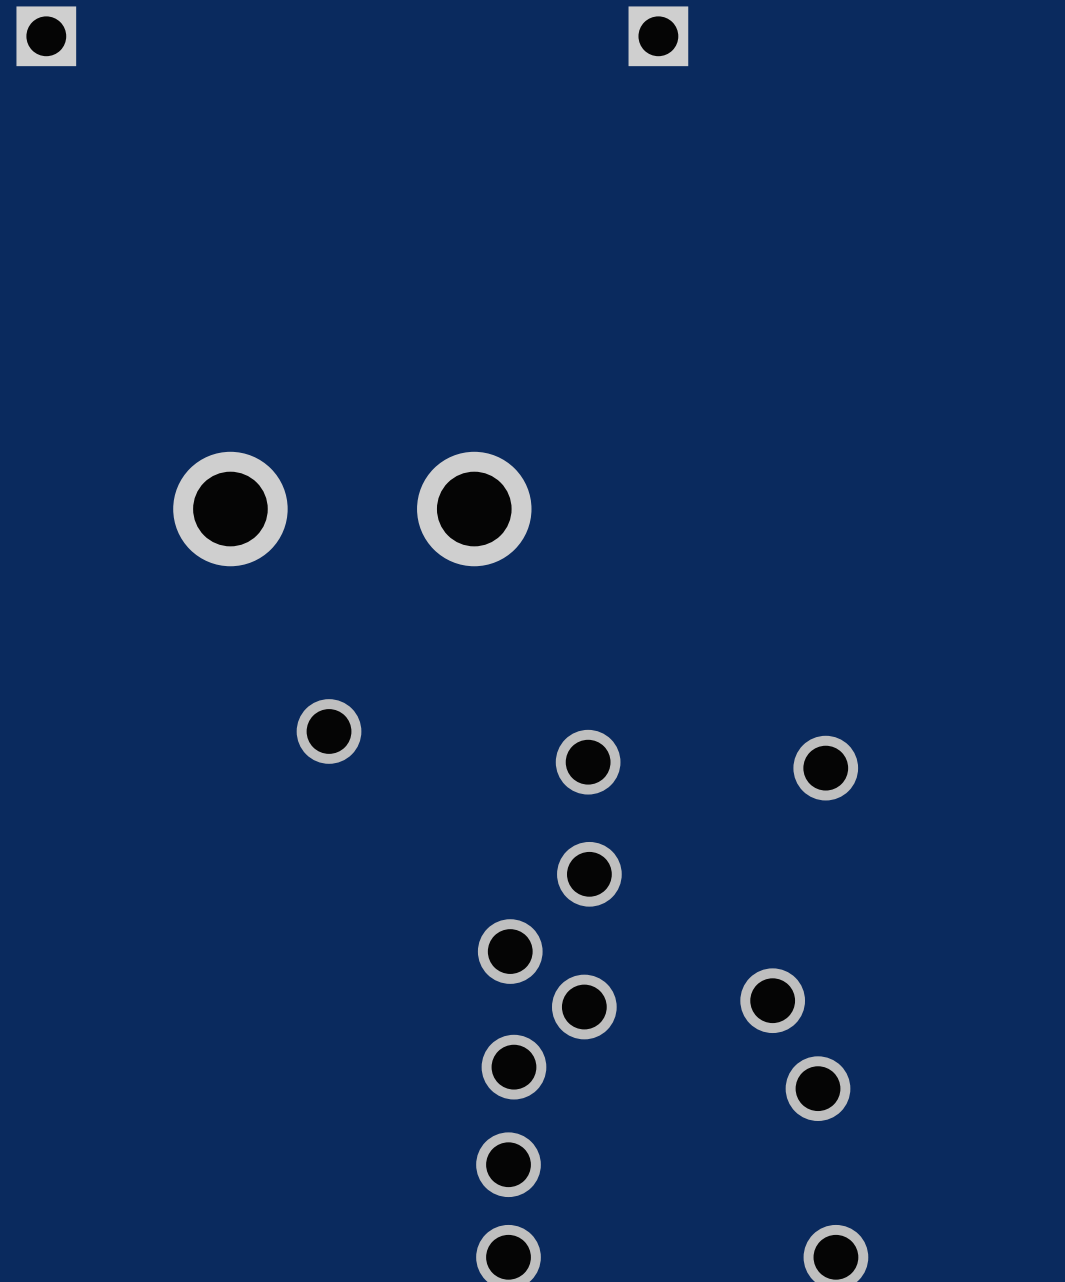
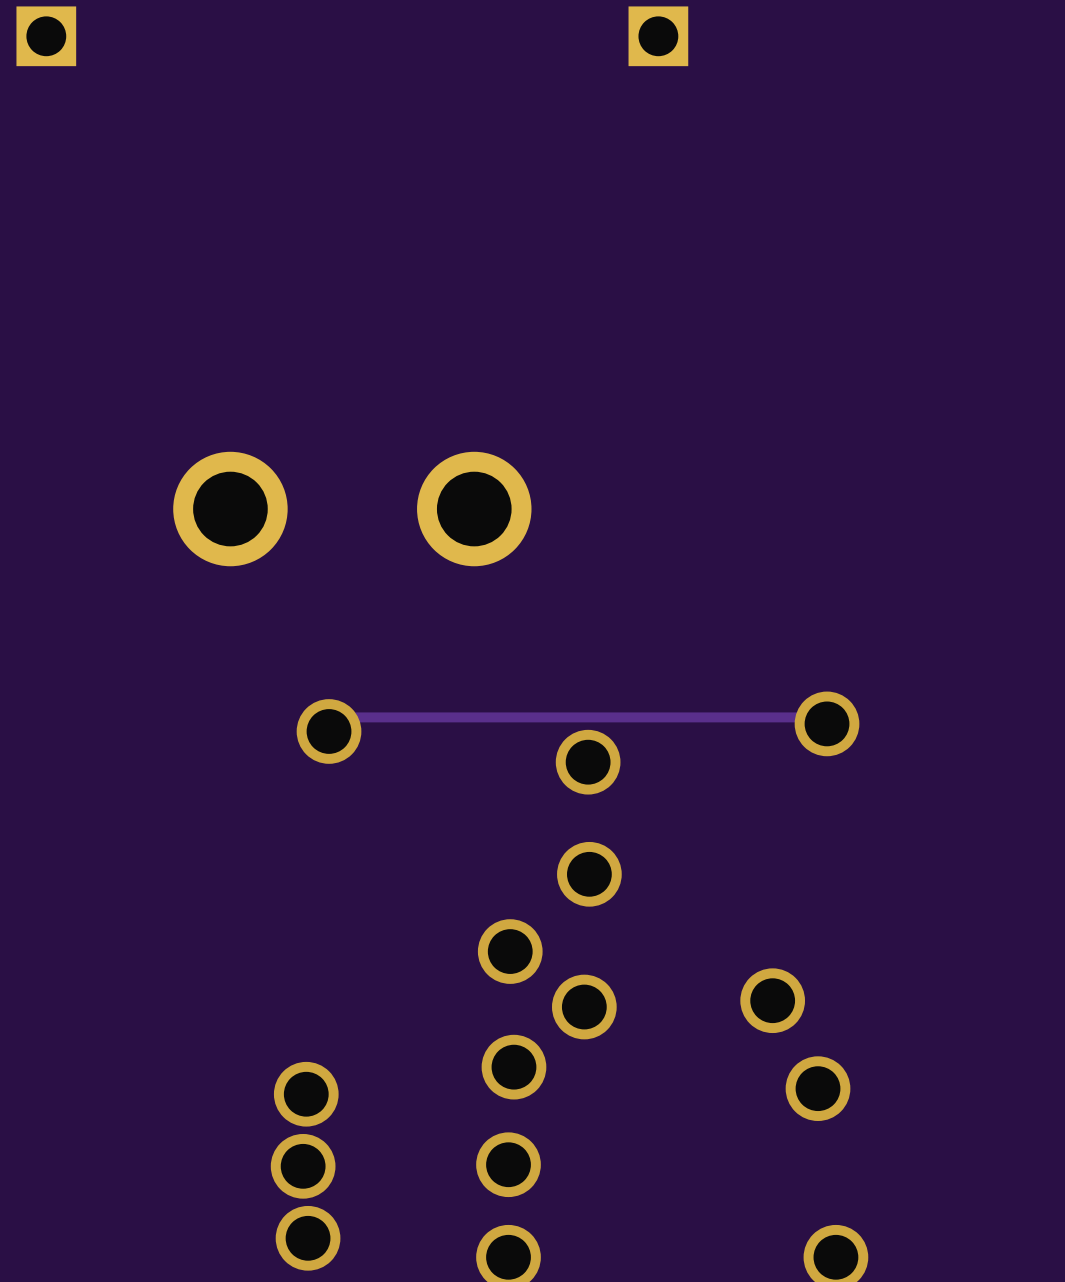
track: none -> (827, 723) (820, 717) (343, 717) (329, 731)
via position: (825, 768) -> (827, 723)
via: none -> (306, 1094)
via: none -> (303, 1166)
via: none -> (308, 1238)

